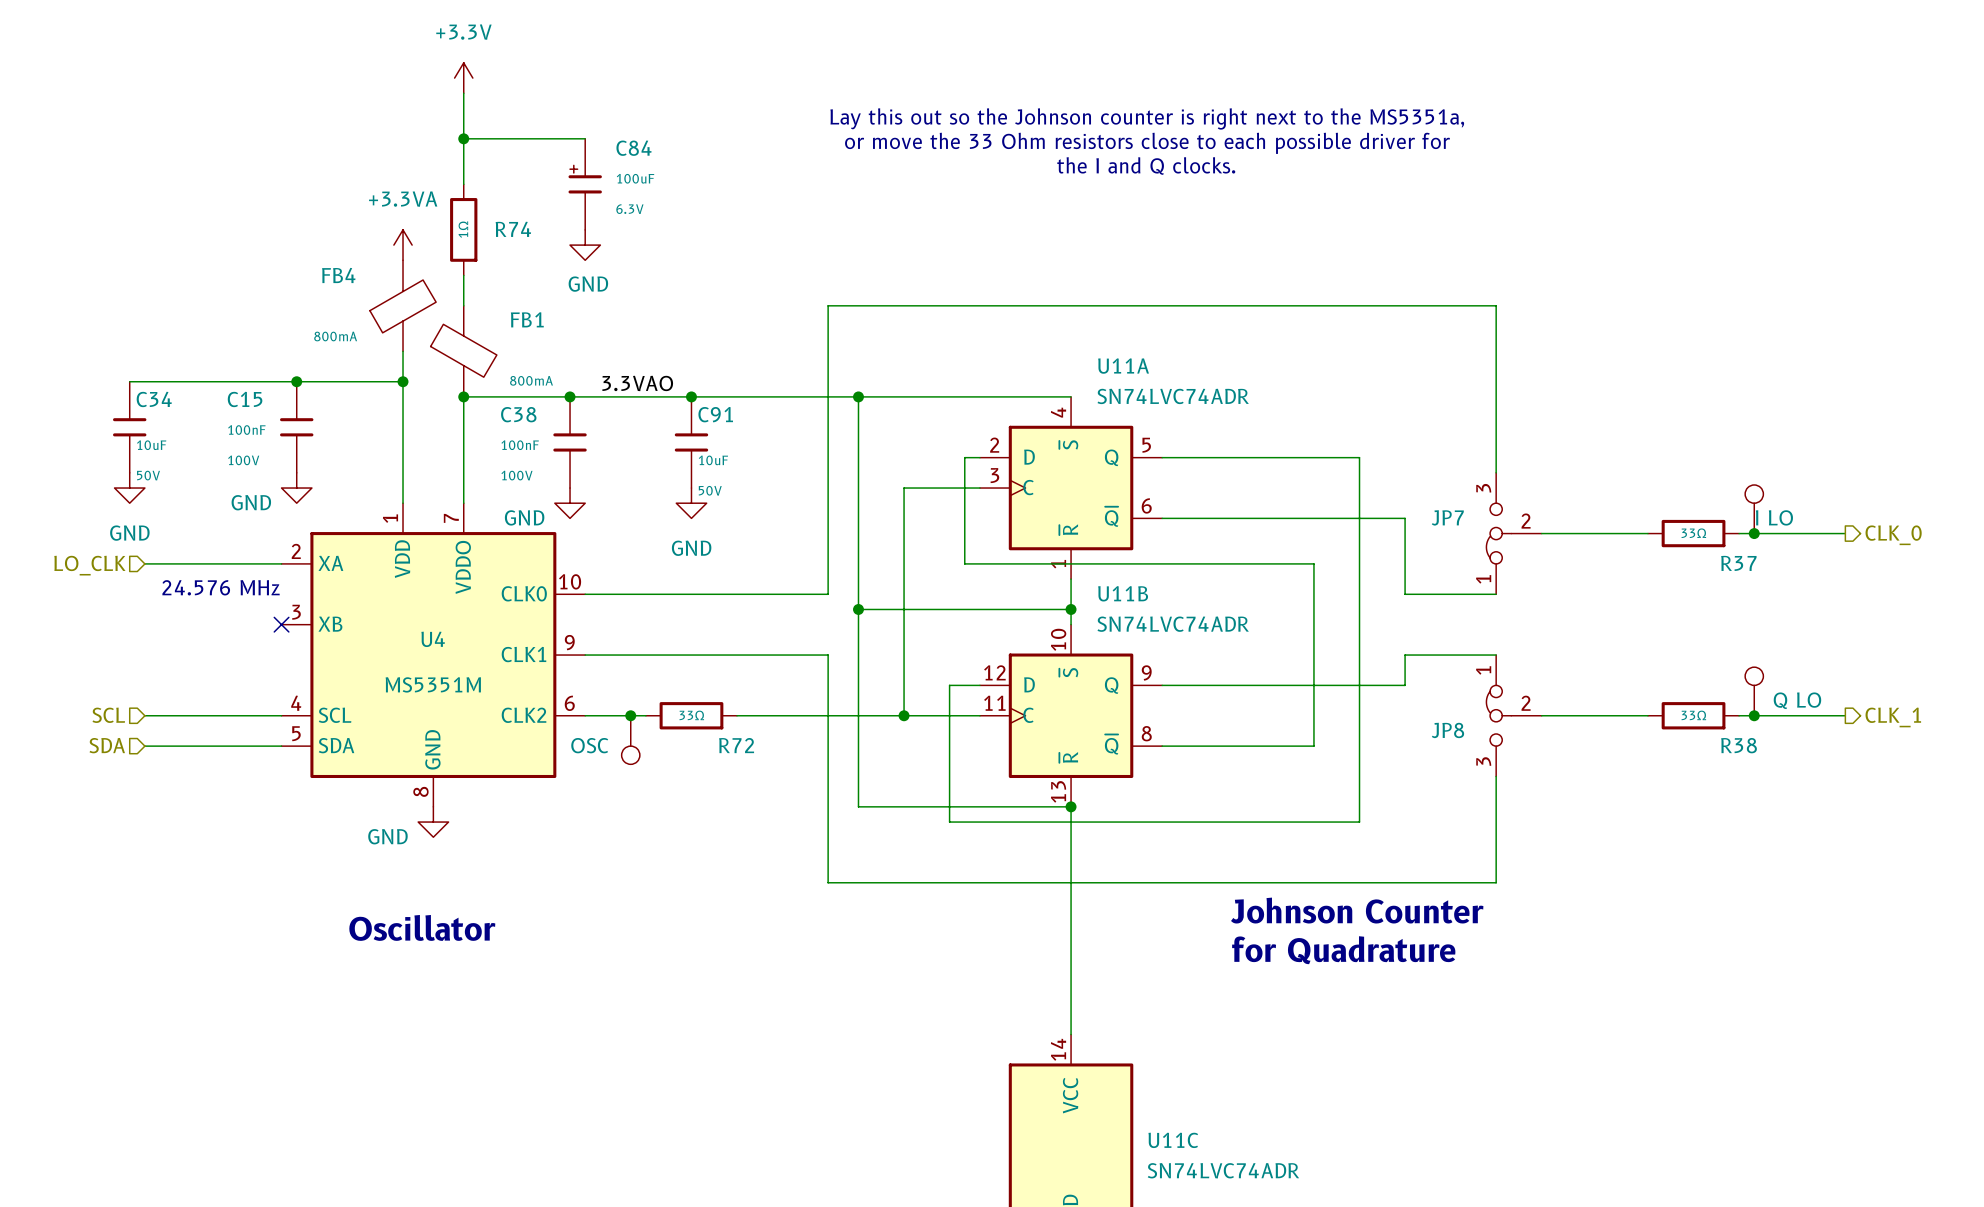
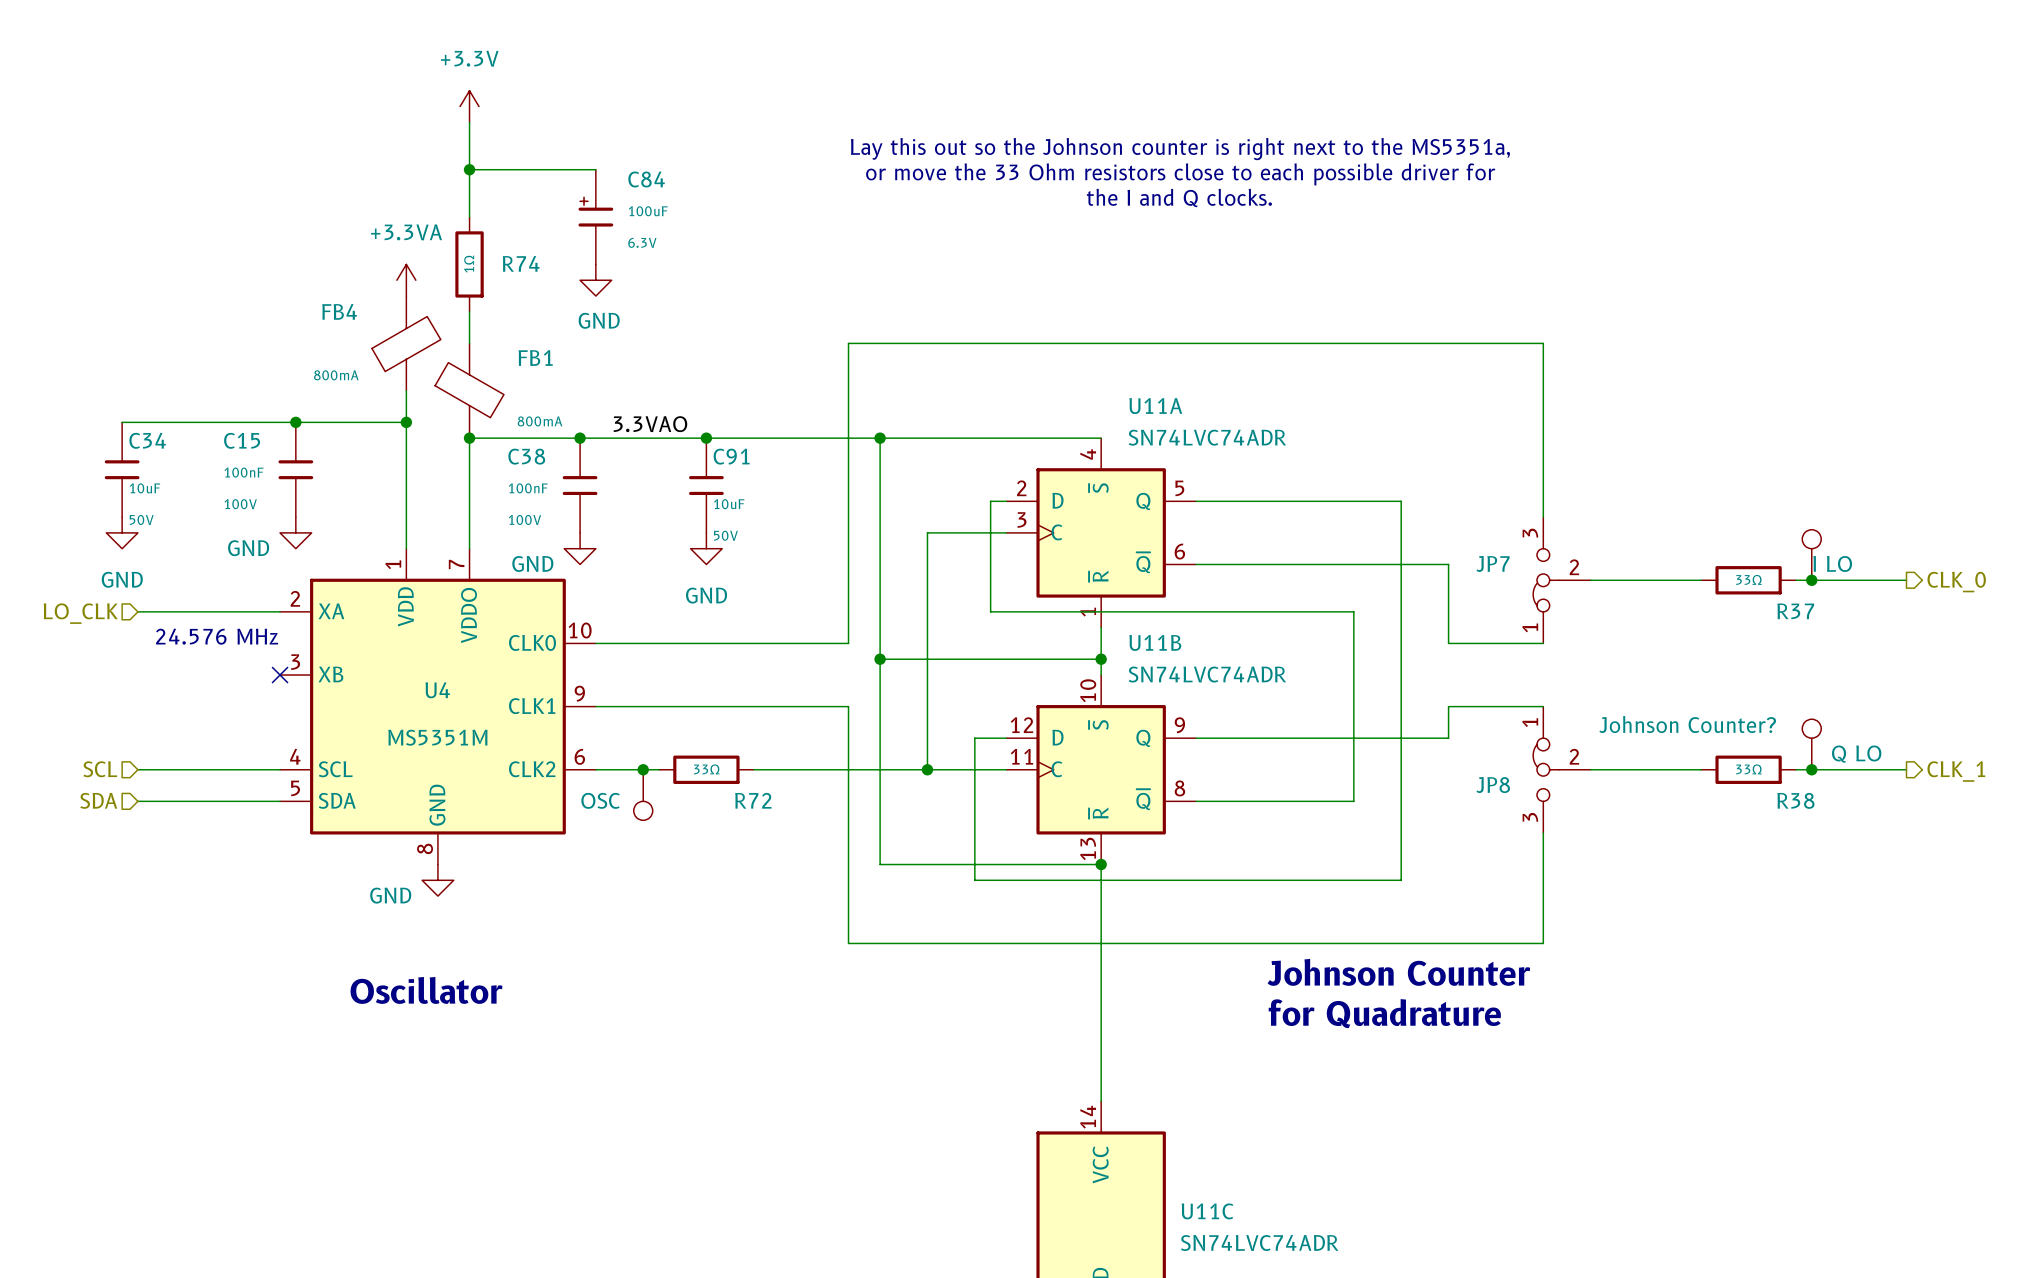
JP8 value: none -> Johnson Counter? (1687, 724)

